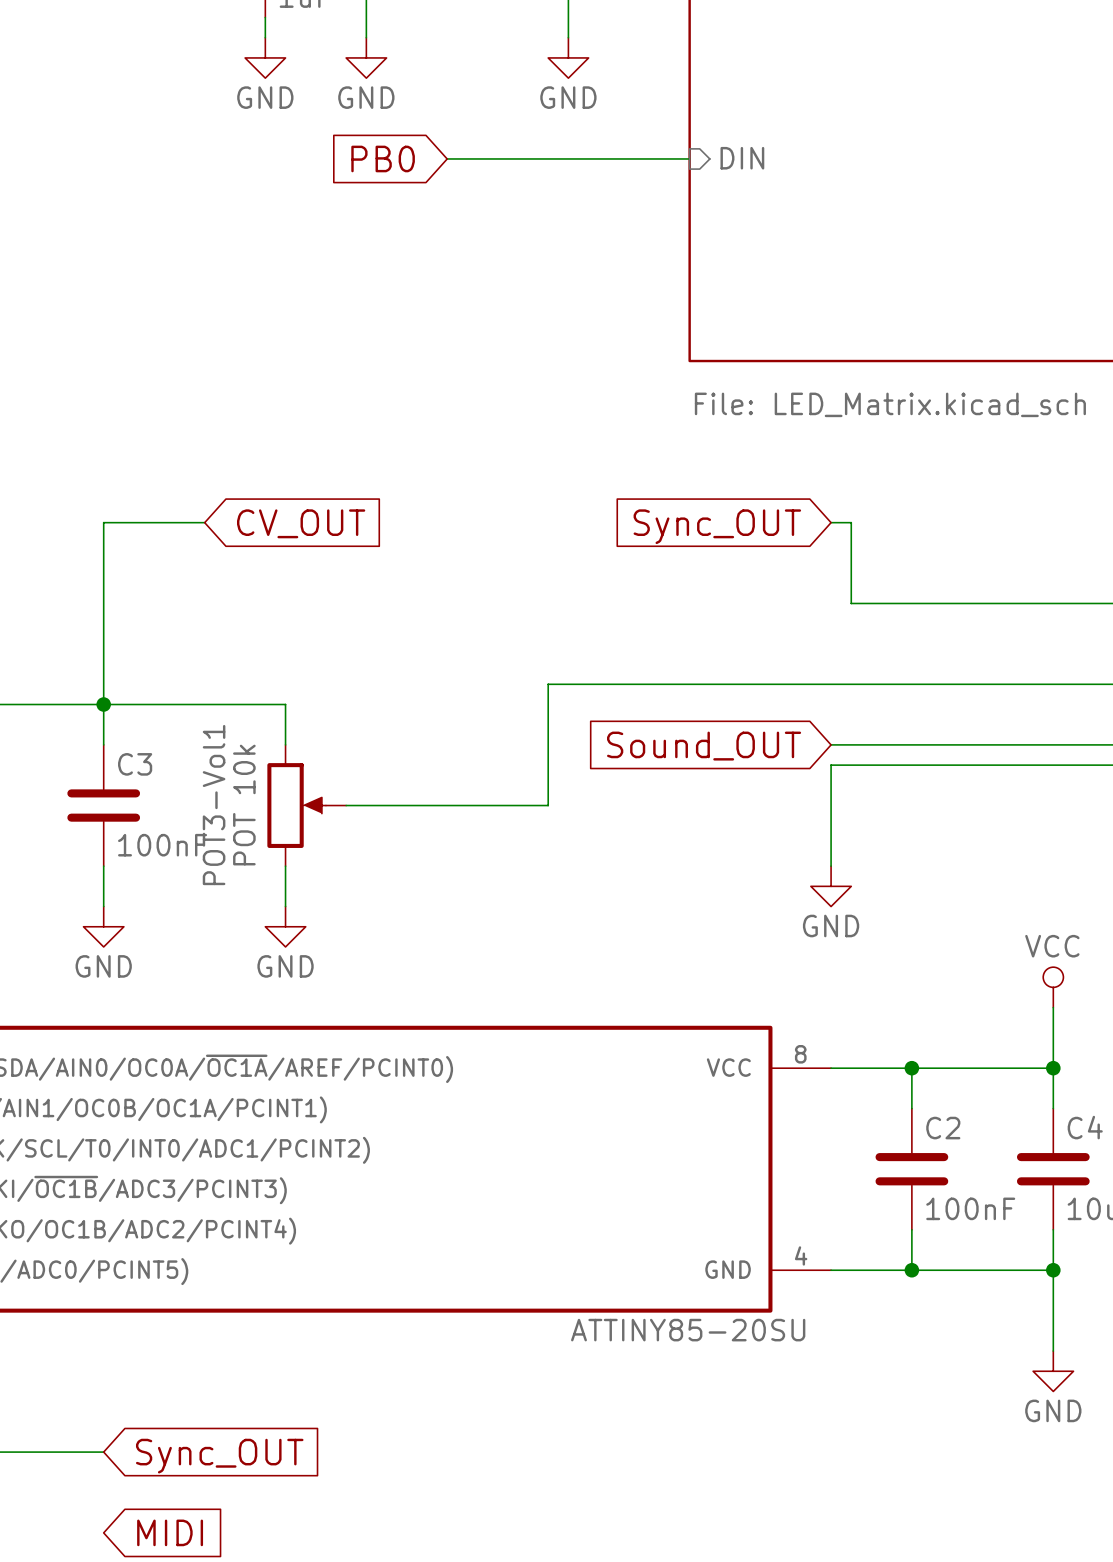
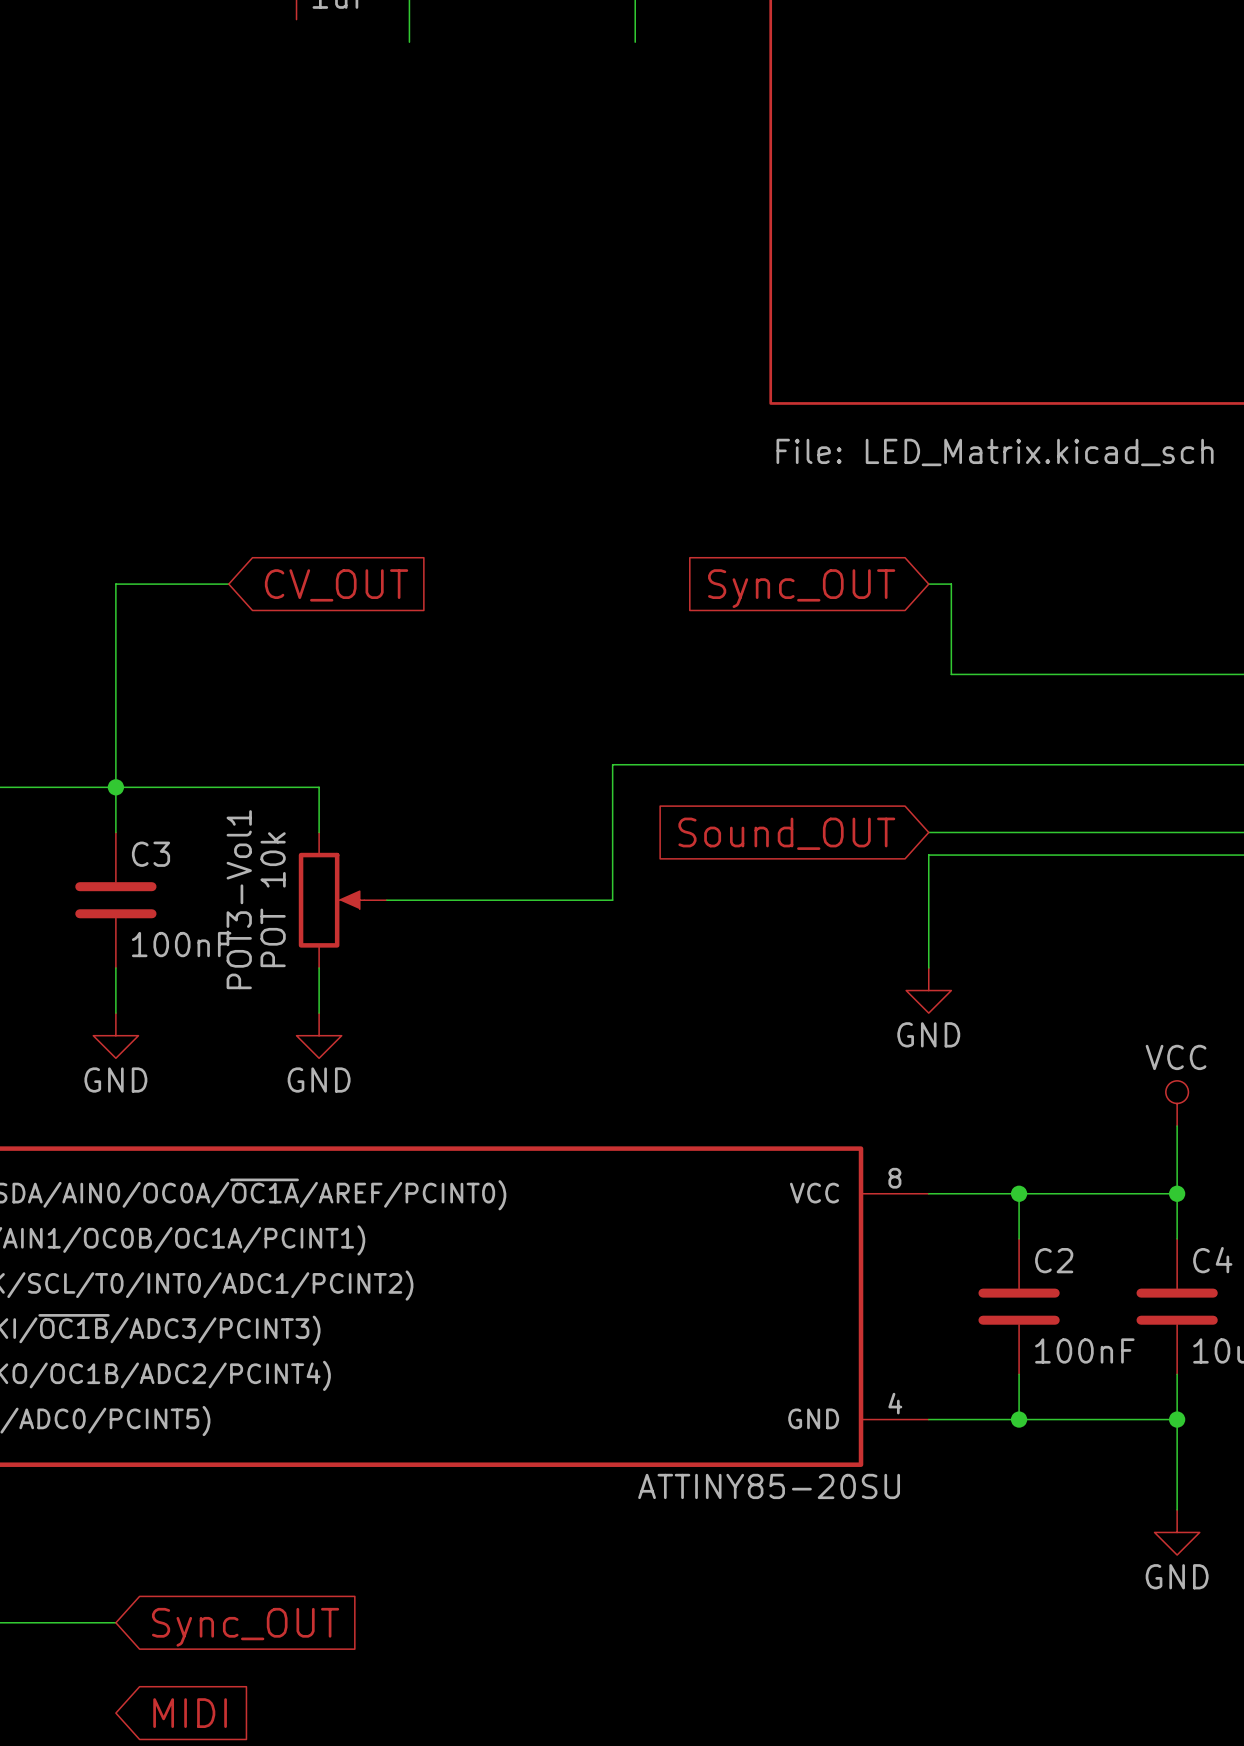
wire: (265, 17) (265, 37) -> none
power symbol: GND (265, 57) -> none
power symbol: GND (366, 57) -> none
power symbol: GND (568, 57) -> none
global label: PB0 (383, 158) -> none
wire: (447, 158) (689, 158) -> none
sheet pin: DIN (742, 158) -> none

